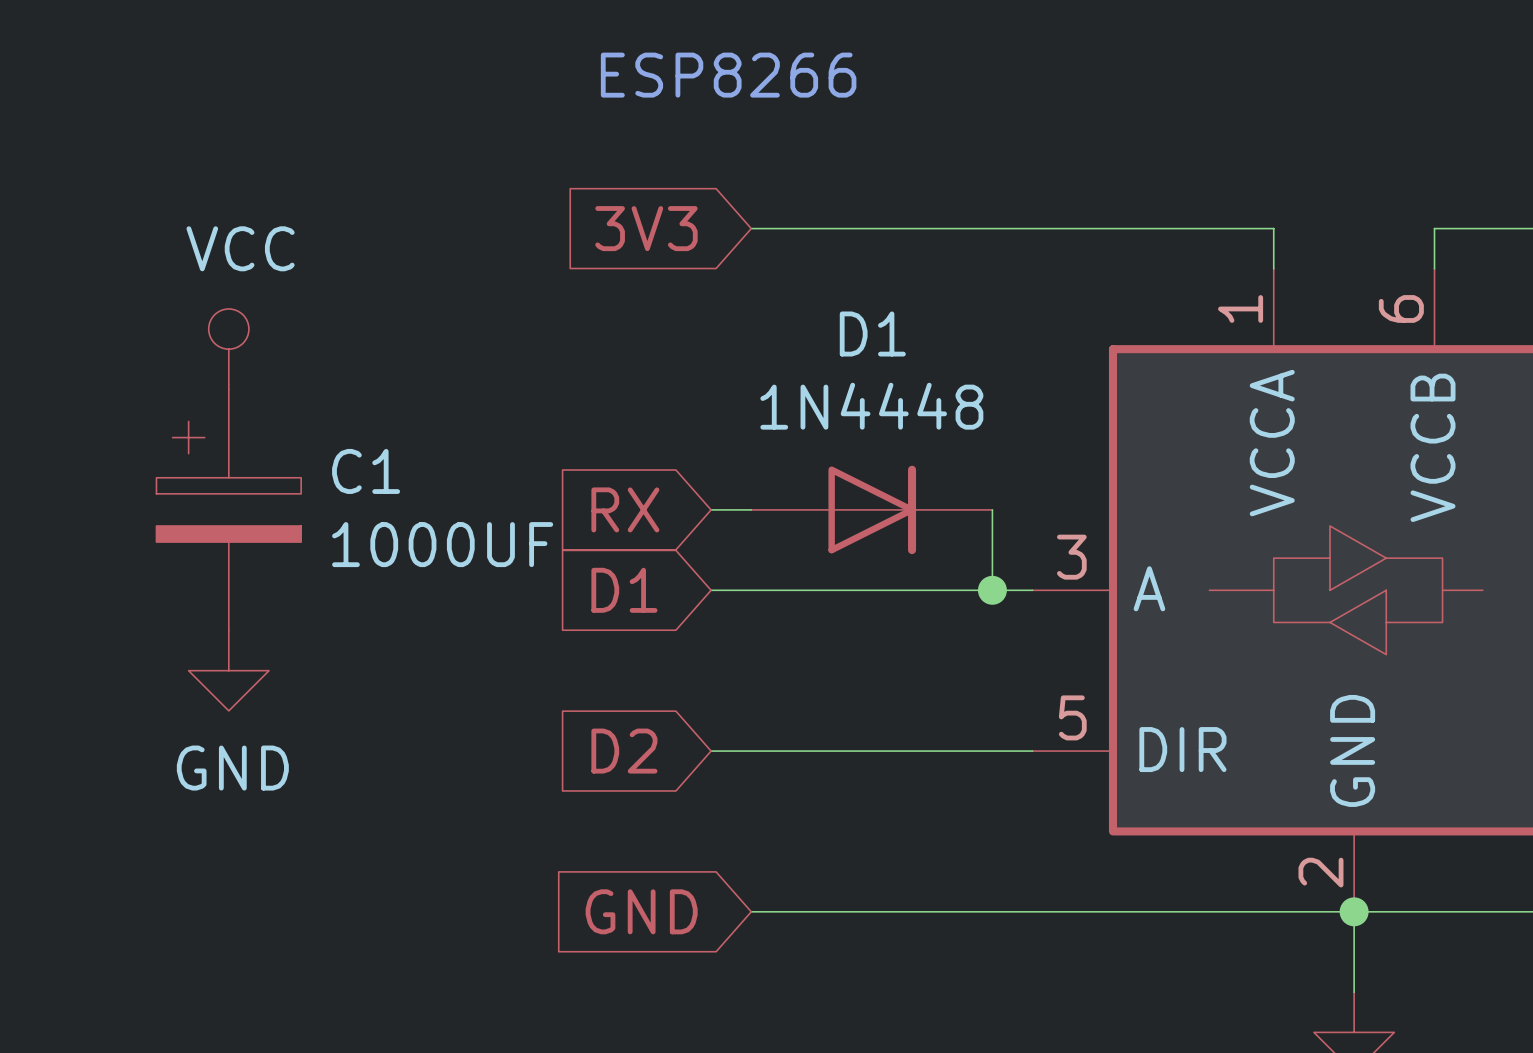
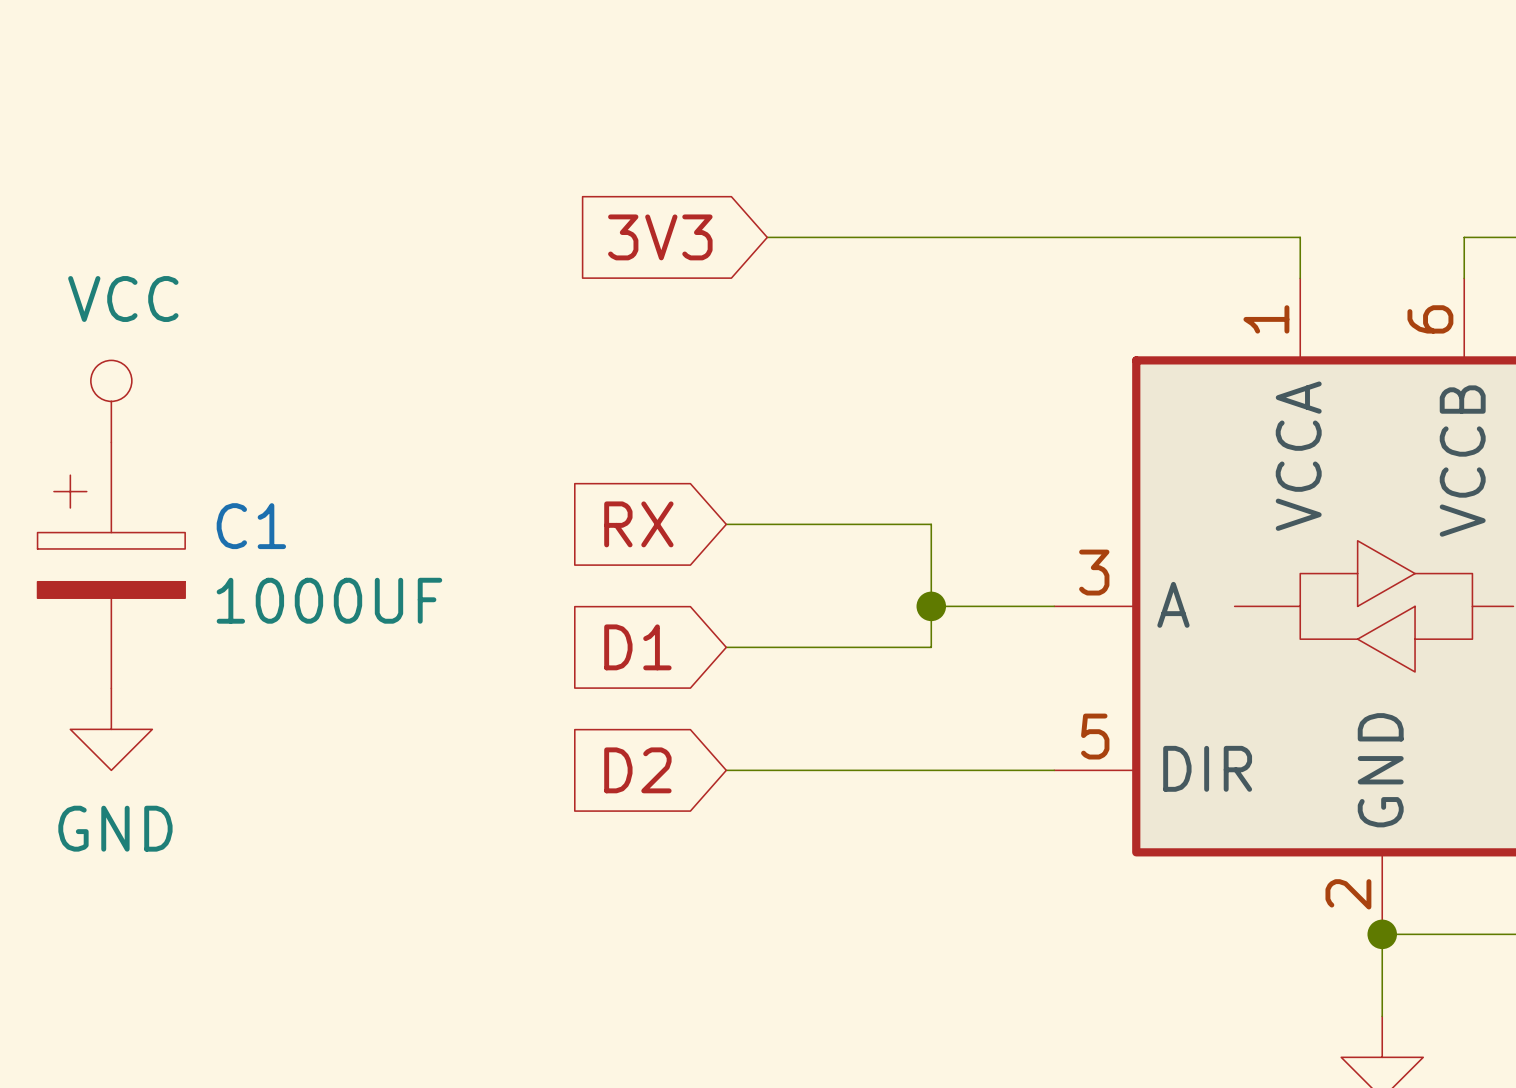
text: ESP8266 (728, 75) -> none
power symbol position: VCC (228, 349) -> VCC (111, 401)
C1 position: (228, 509) -> (111, 565)
wire: none -> (767, 524) (931, 524) (931, 647) (726, 647)
D1: 1N4448 (871, 509) -> none
wire: (992, 509) (992, 590) -> none
global label position: D1 (624, 590) -> D1 (637, 647)
wire: (711, 590) (912, 590) -> none
junction position: (992, 590) -> (931, 606)
power symbol position: GND (228, 670) -> GND (111, 729)
global label: GND (641, 911) -> none
wire: (751, 911) (1354, 911) -> none

